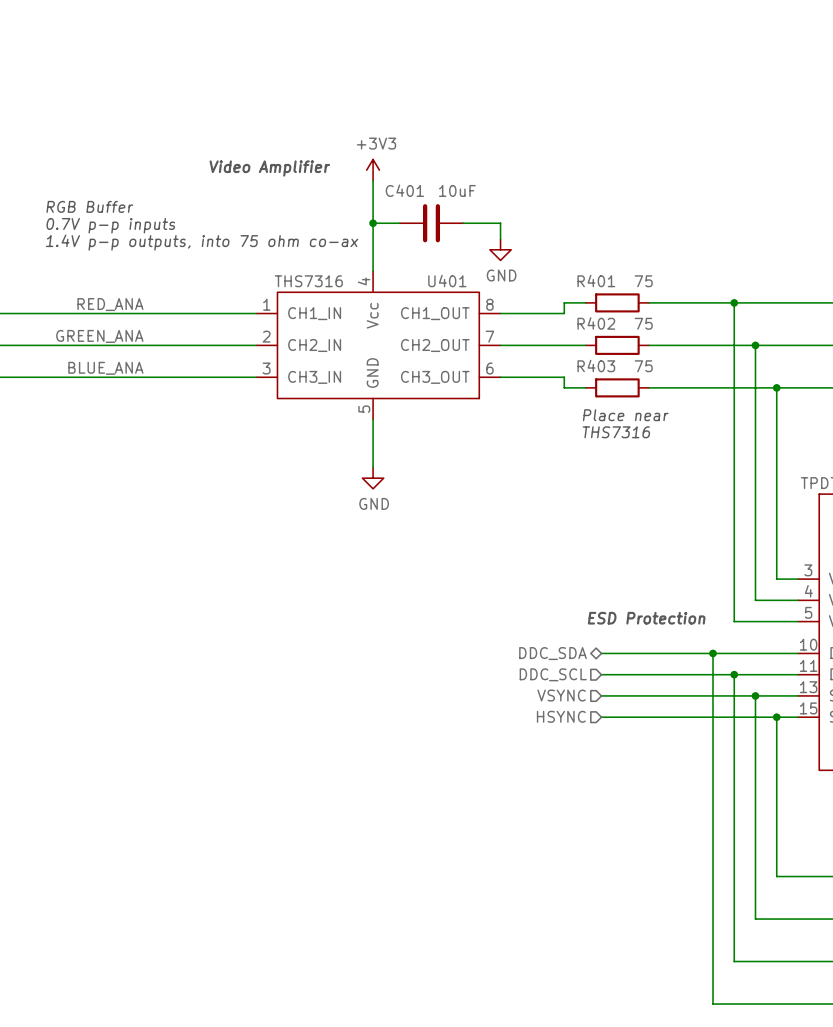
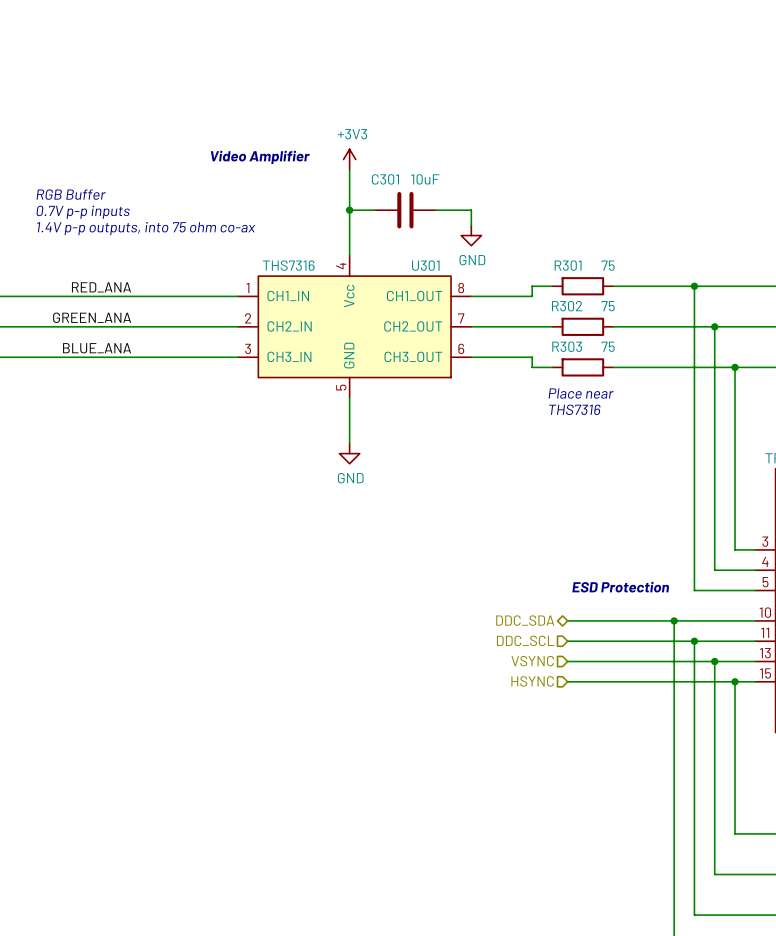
C401 name: C401 (404, 190) -> C301 (385, 179)
U401 name: U401 (447, 281) -> U301 (425, 265)
R401 name: R401 (596, 281) -> R301 (568, 265)
R402 name: R402 (596, 323) -> R302 (567, 306)
R403 name: R403 (596, 365) -> R303 (567, 346)

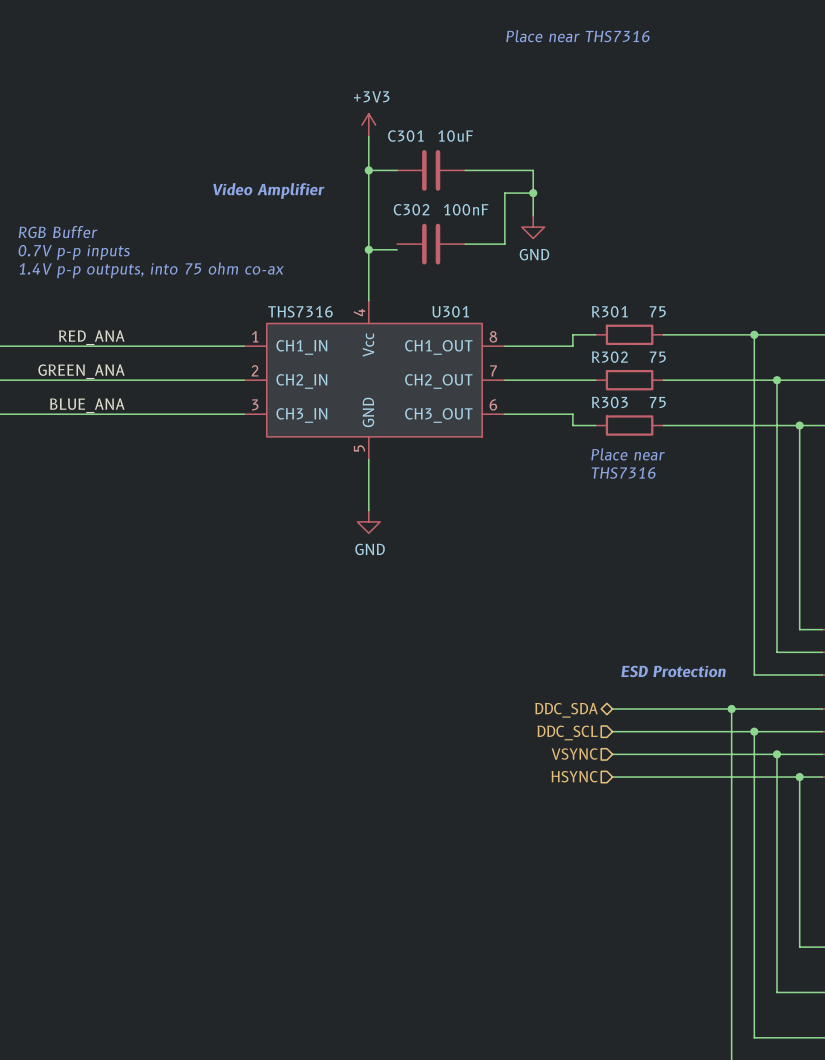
text: none -> Place near THS7316 (577, 36)
wire: none -> (368, 136) (368, 204)
wire: none -> (368, 170) (397, 170)
junction: none -> (368, 170)
wire: none -> (465, 170) (533, 170) (533, 215)
power symbol position: +3V3 (349, 159) -> +3V3 (368, 125)
wire: none -> (533, 193) (504, 193) (504, 244) (465, 244)
junction: none -> (533, 193)
C302: none -> 100nF (431, 244)
C301 position: (405, 210) -> (431, 170)
wire: (435, 210) (471, 210) (471, 225) -> none
power symbol position: GND (471, 235) -> GND (533, 227)

